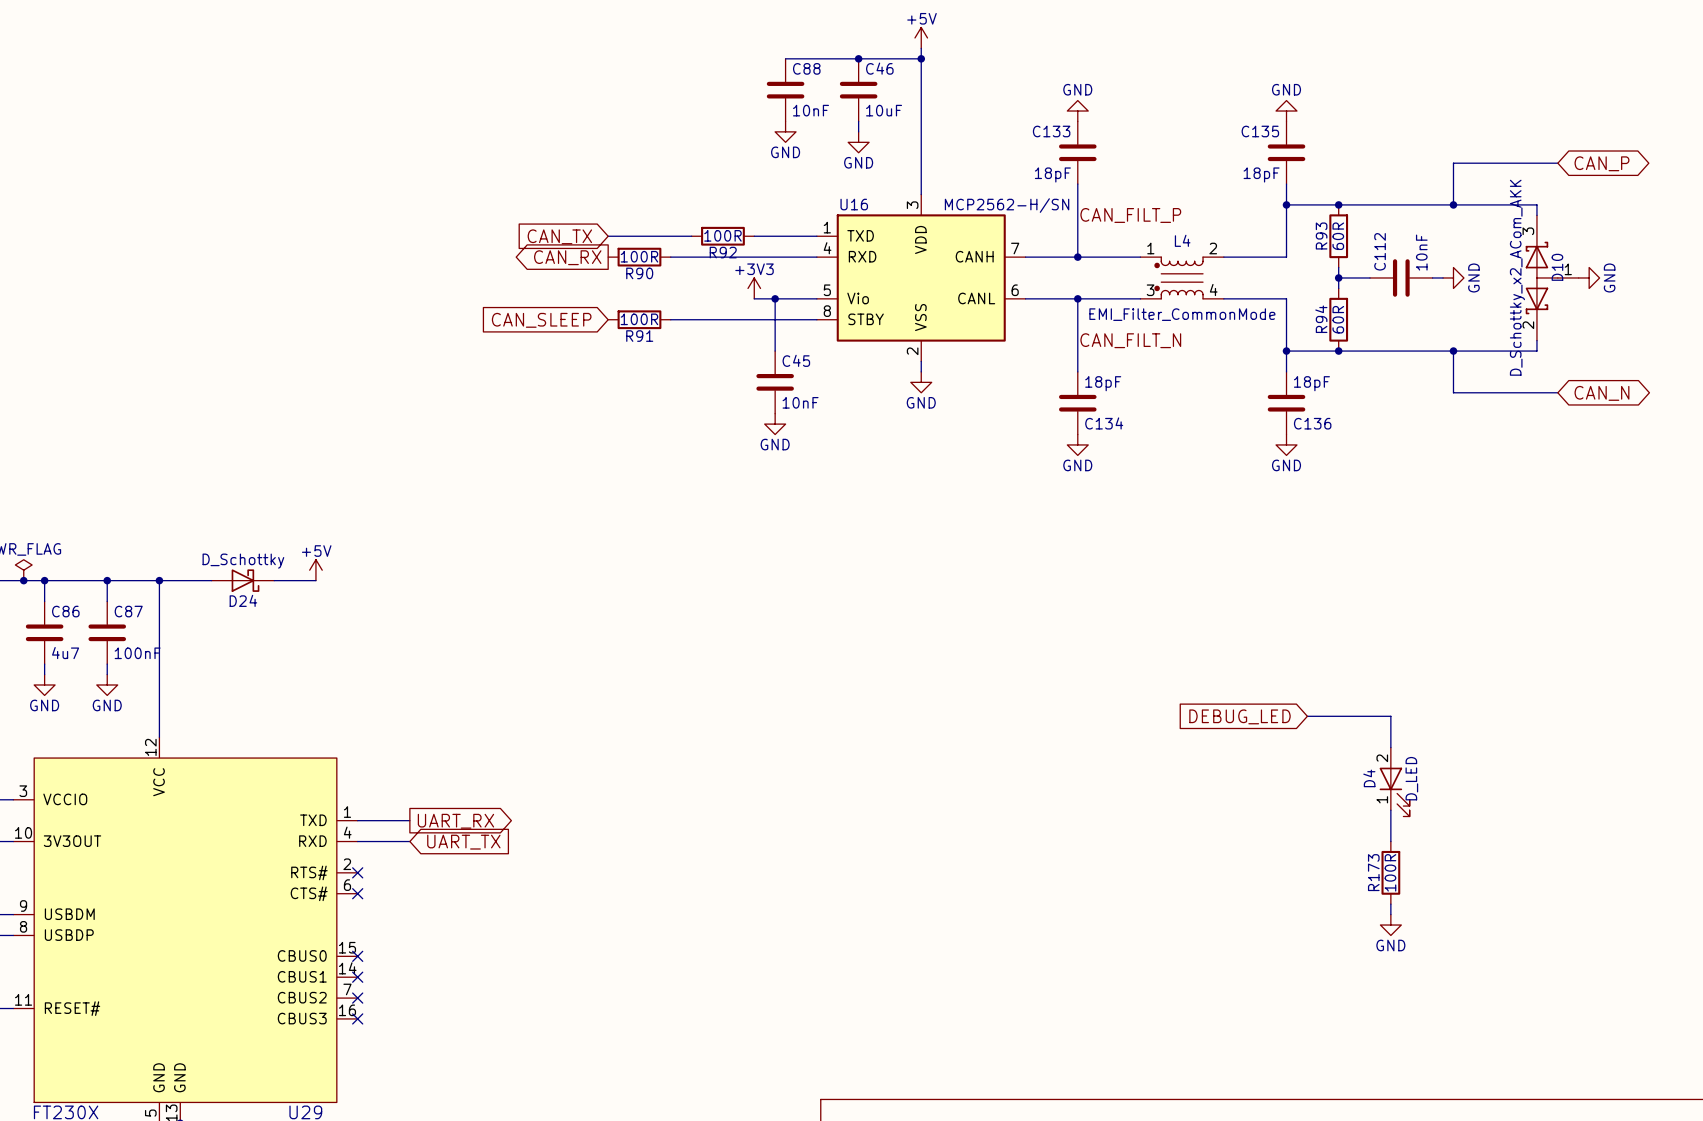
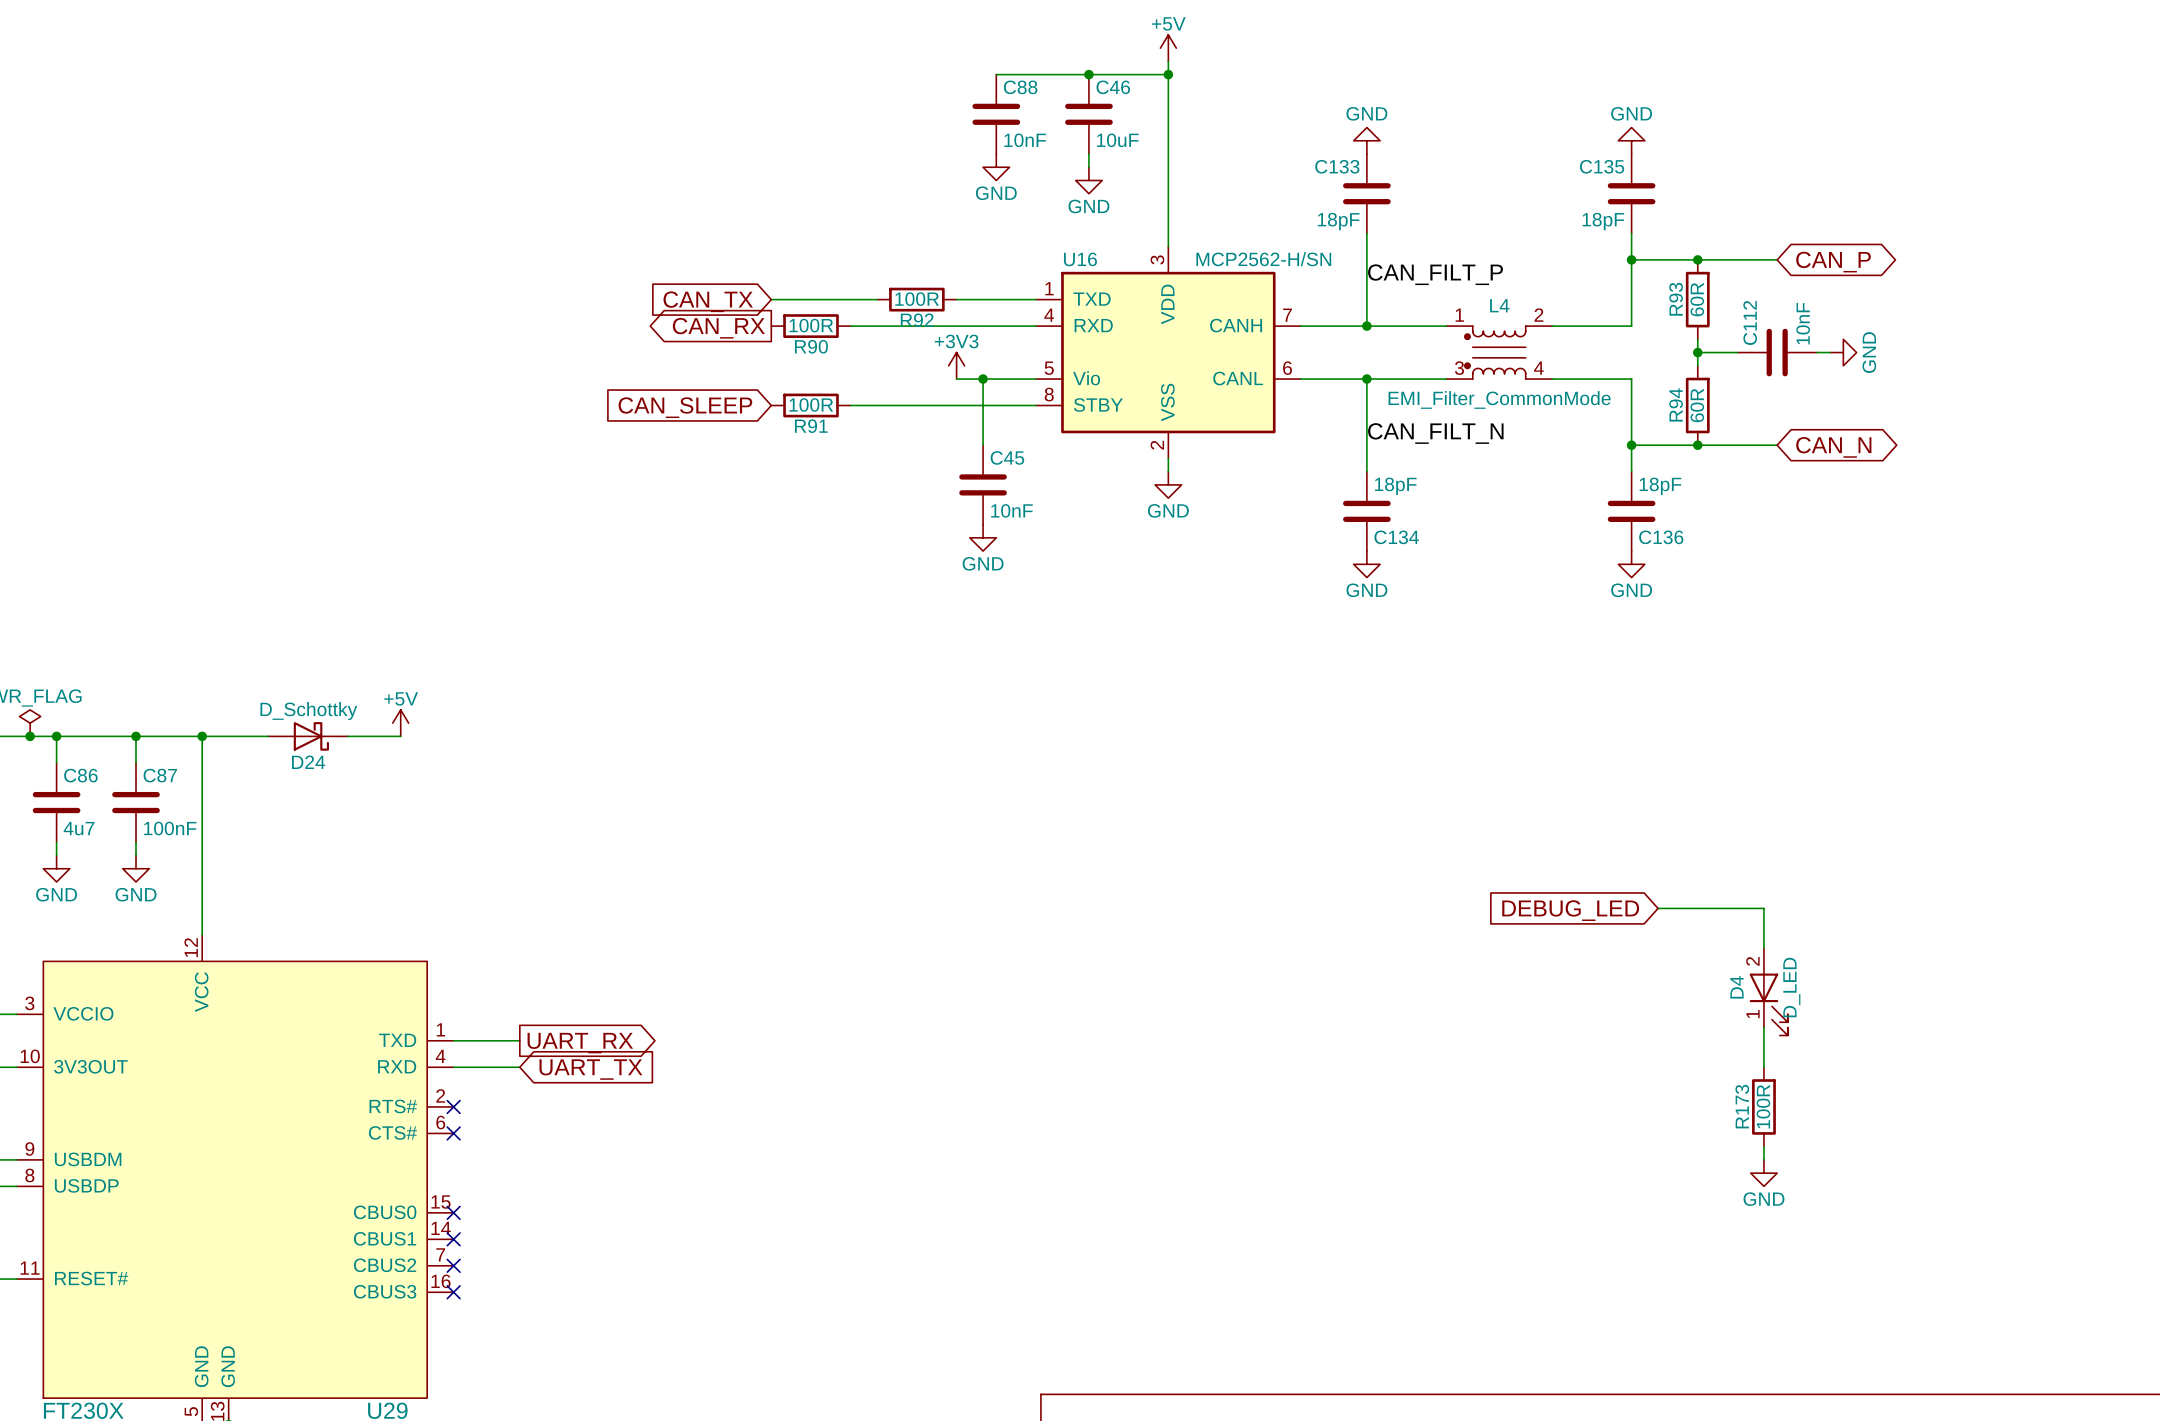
wire: (1557, 163) (1453, 163) (1453, 204) -> none
global label position: CAN_P (1601, 163) -> CAN_P (1833, 262)
wire: (1401, 204) (1536, 204) (1536, 215) -> none
junction: (1453, 204) -> none
D10: D_Schottky_x2_ACom_AKK (1552, 277) -> none
power symbol: GND (1589, 277) -> none
wire: (1536, 340) (1536, 351) (1401, 351) -> none
wire: (1453, 351) (1453, 392) (1557, 392) -> none
junction: (1453, 351) -> none
global label position: CAN_N (1601, 393) -> CAN_N (1833, 447)

